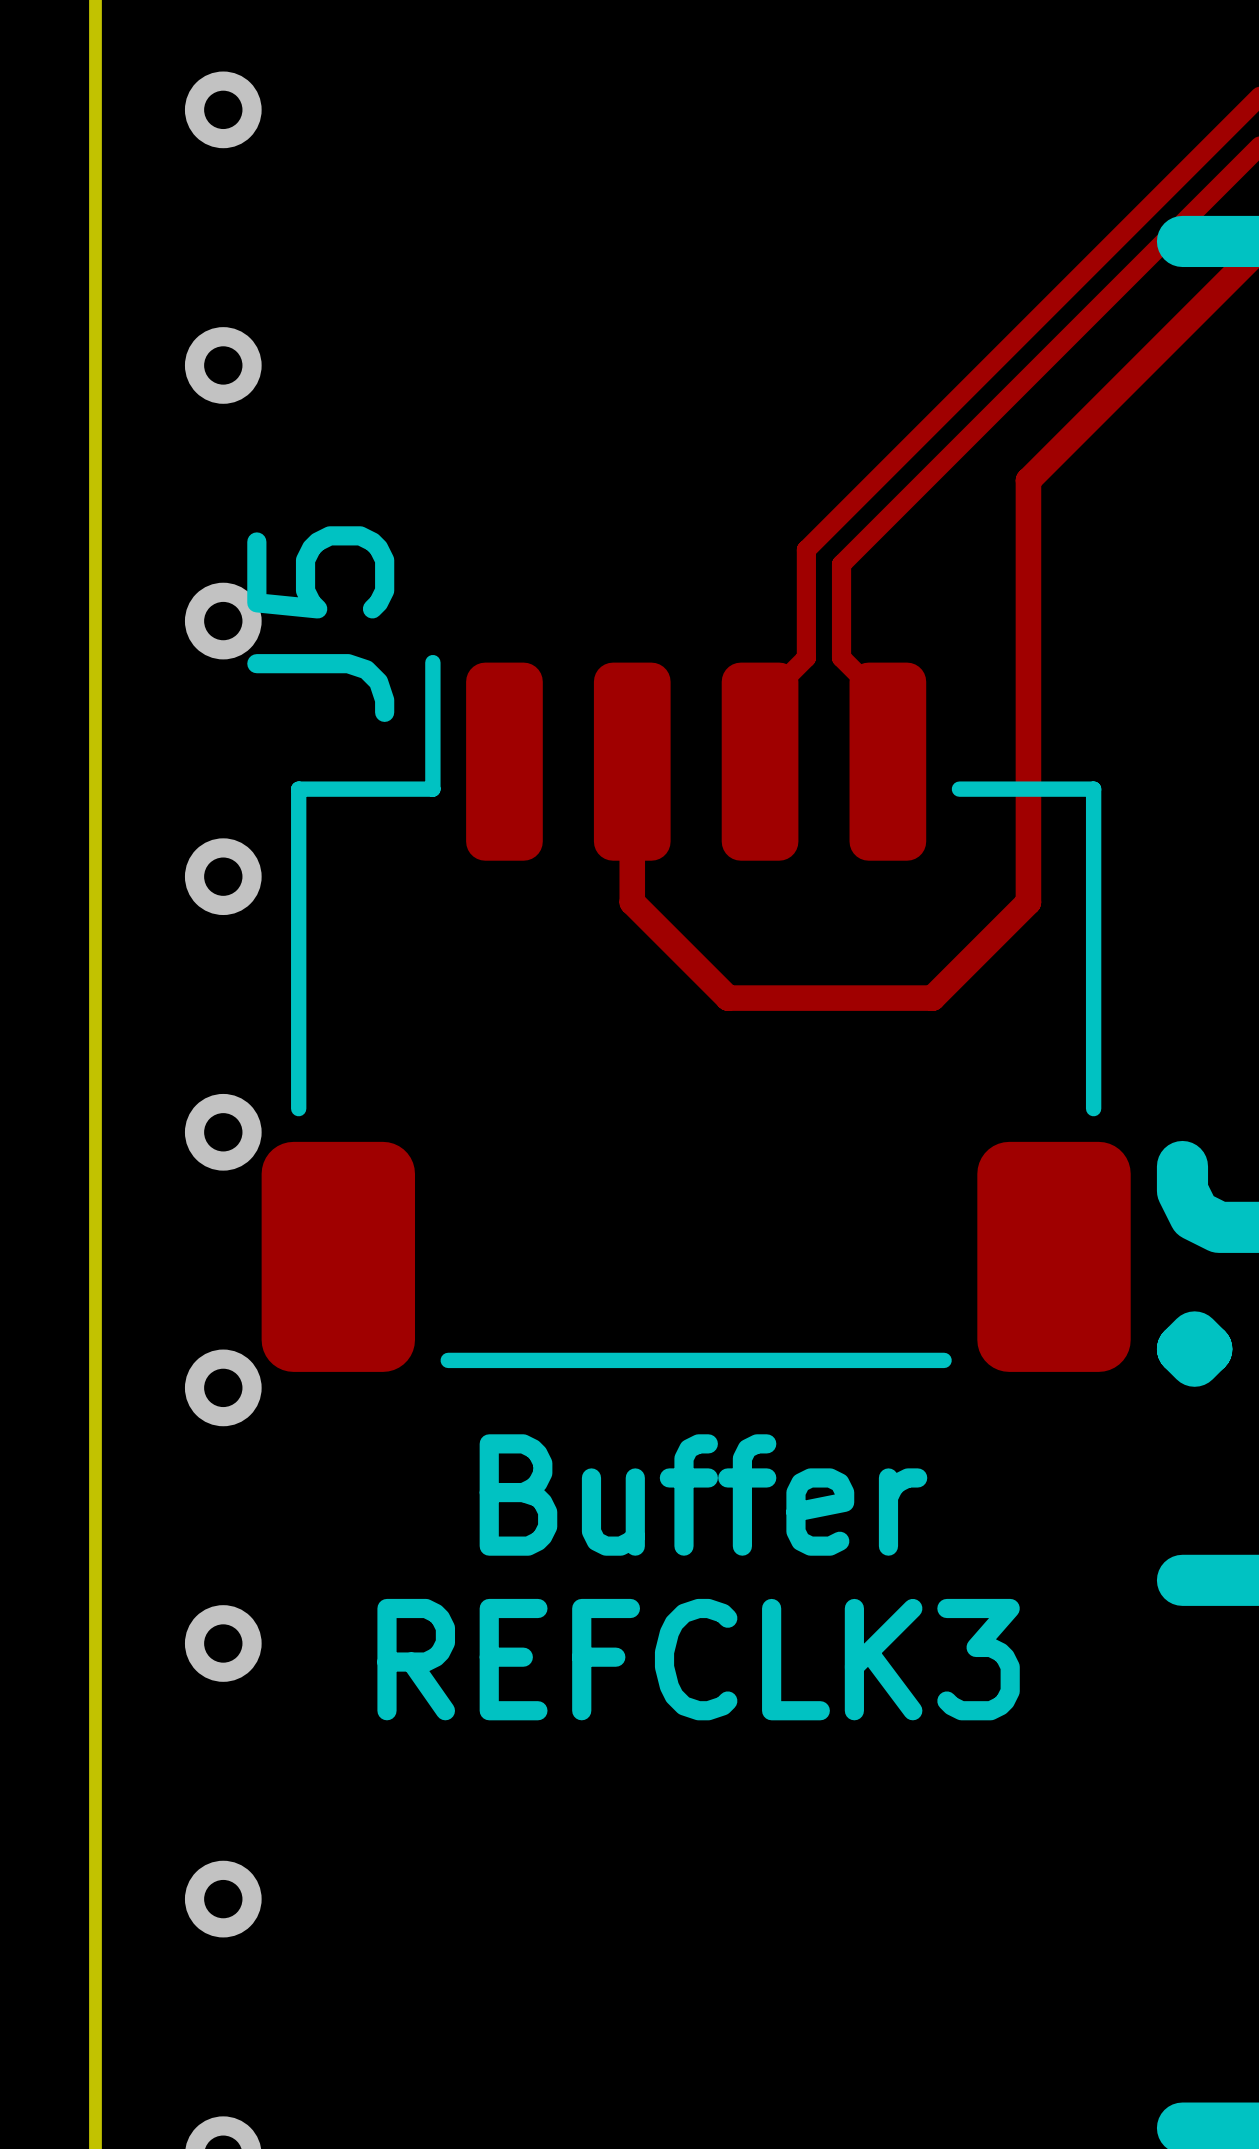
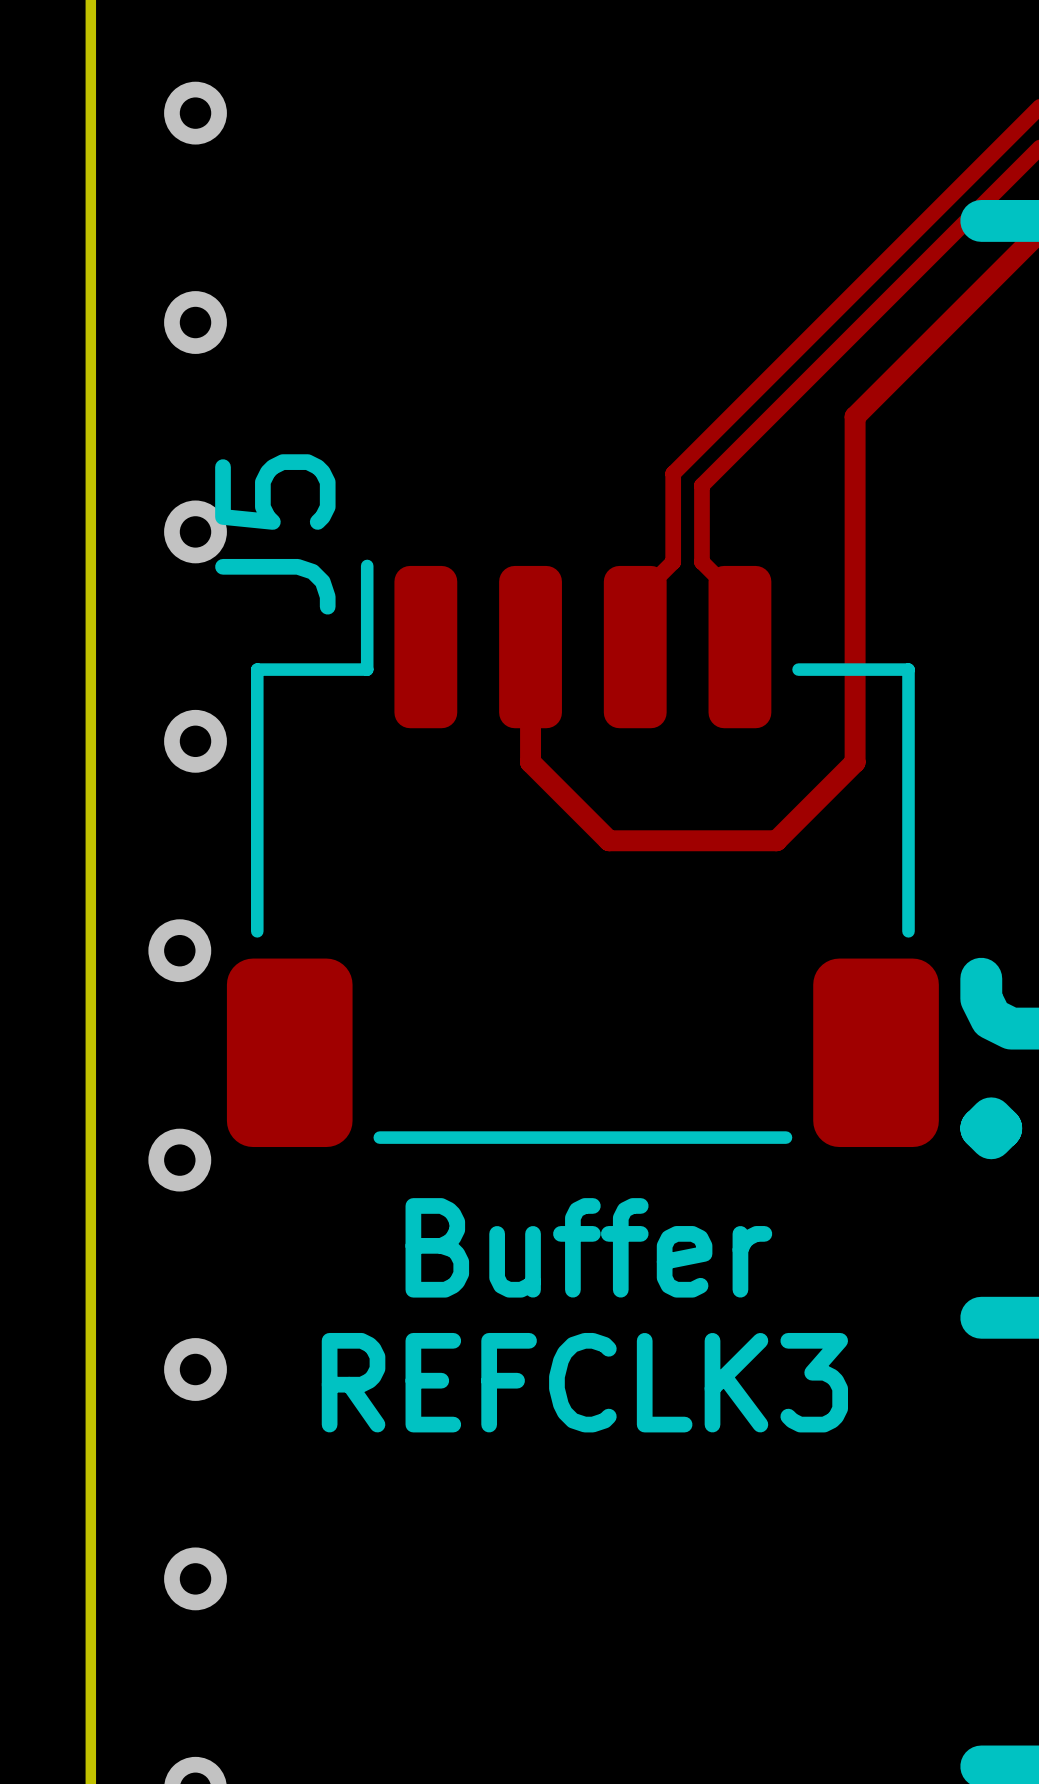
via position: (223, 1132) -> (179, 950)
via position: (223, 1387) -> (179, 1160)

